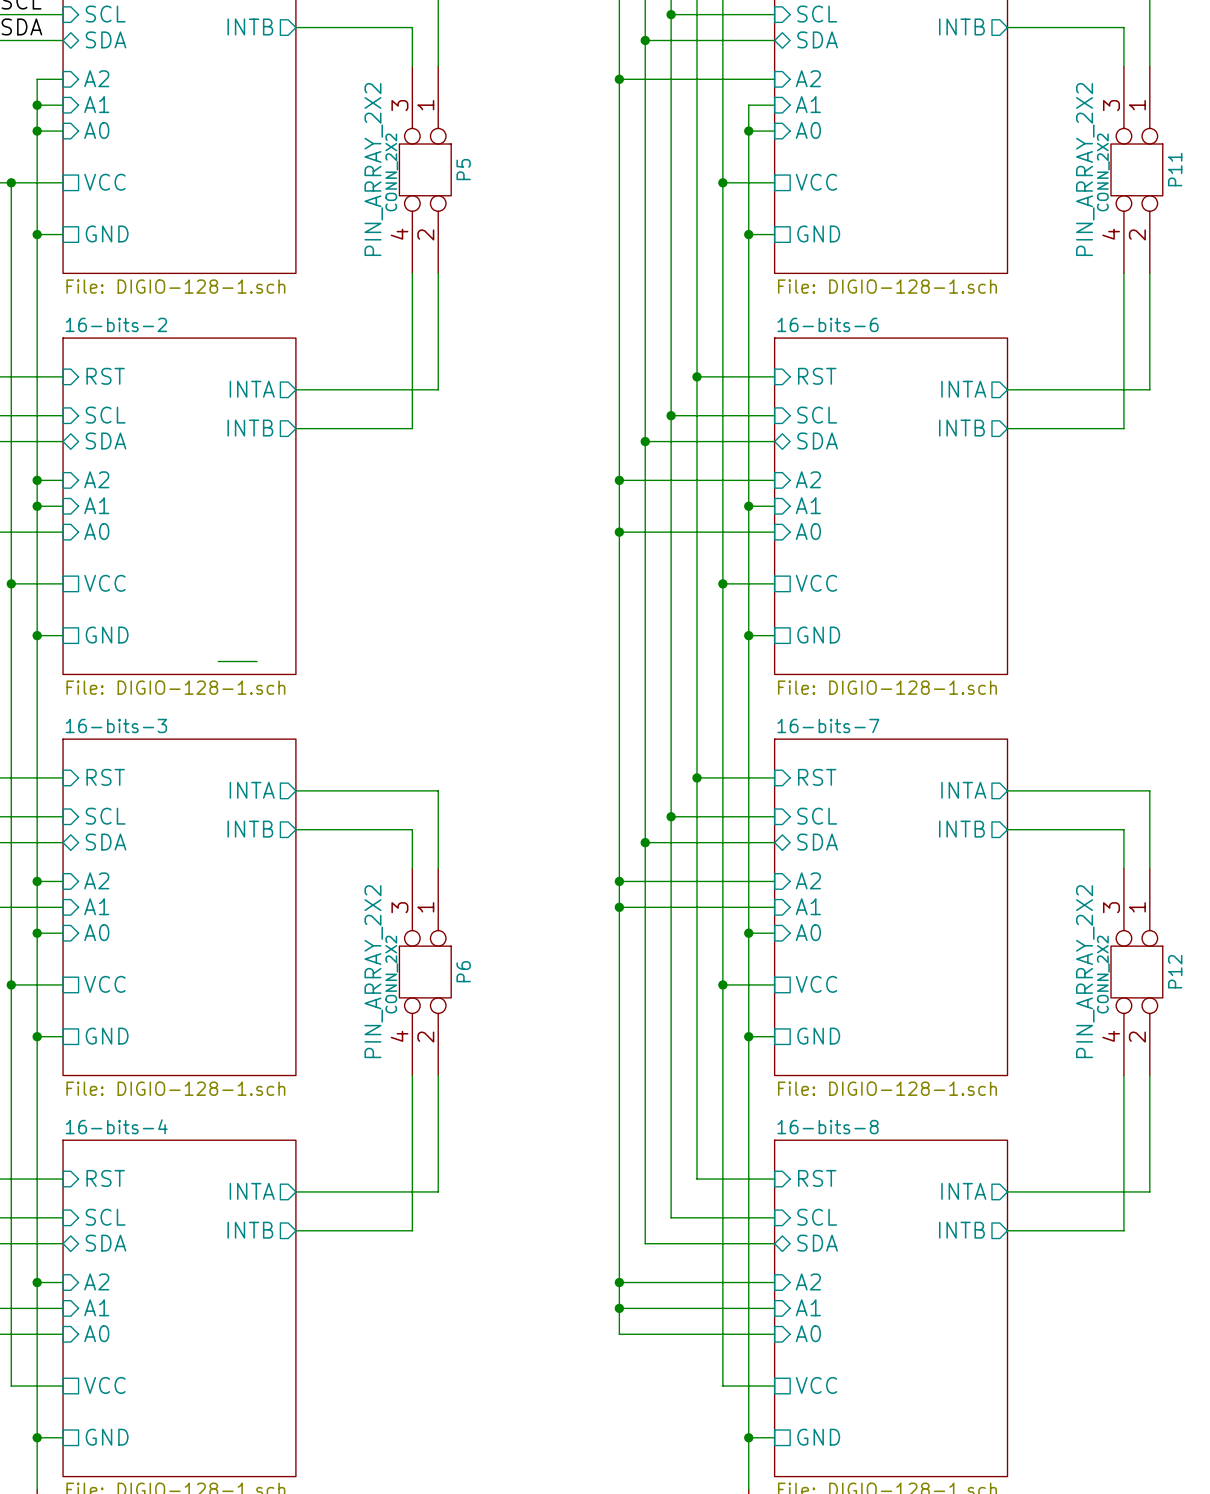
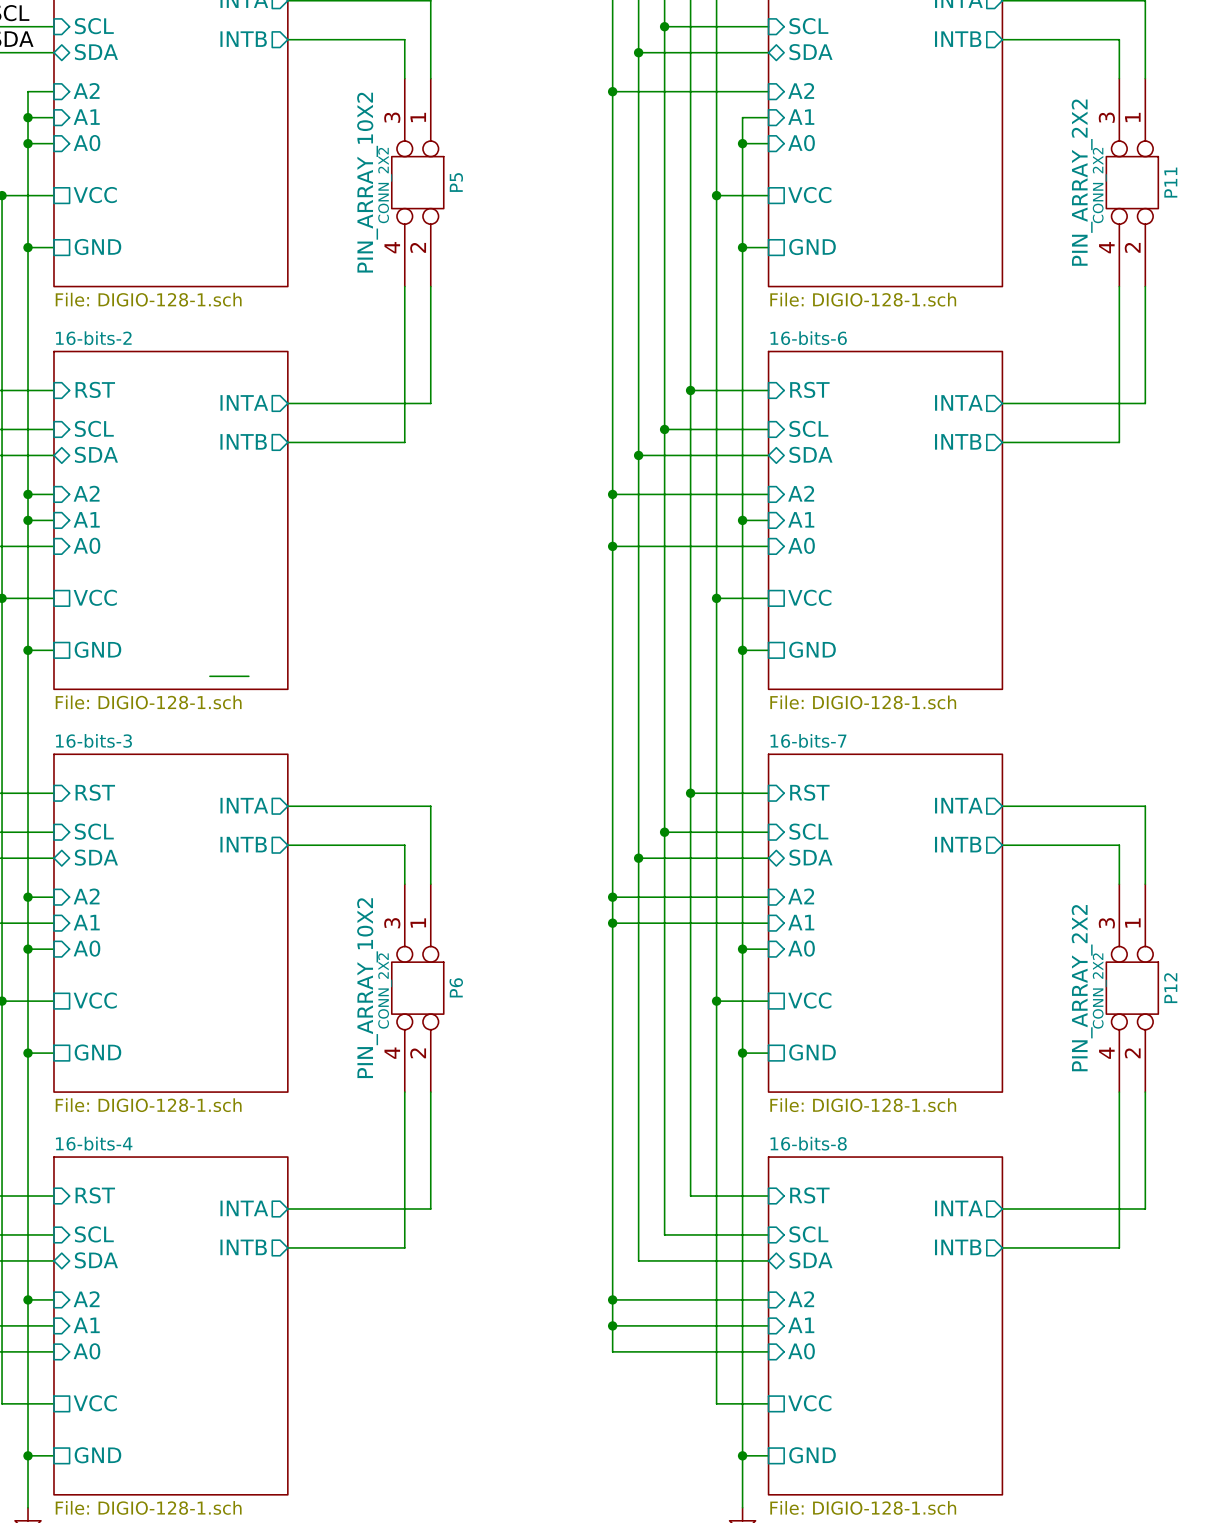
P5 text: PIN_ARRAY_2X2 (373, 169) -> PIN_ARRAY_10X2 (367, 182)
P6 text: PIN_ARRAY_2X2 (373, 971) -> PIN_ARRAY_10X2 (367, 988)

